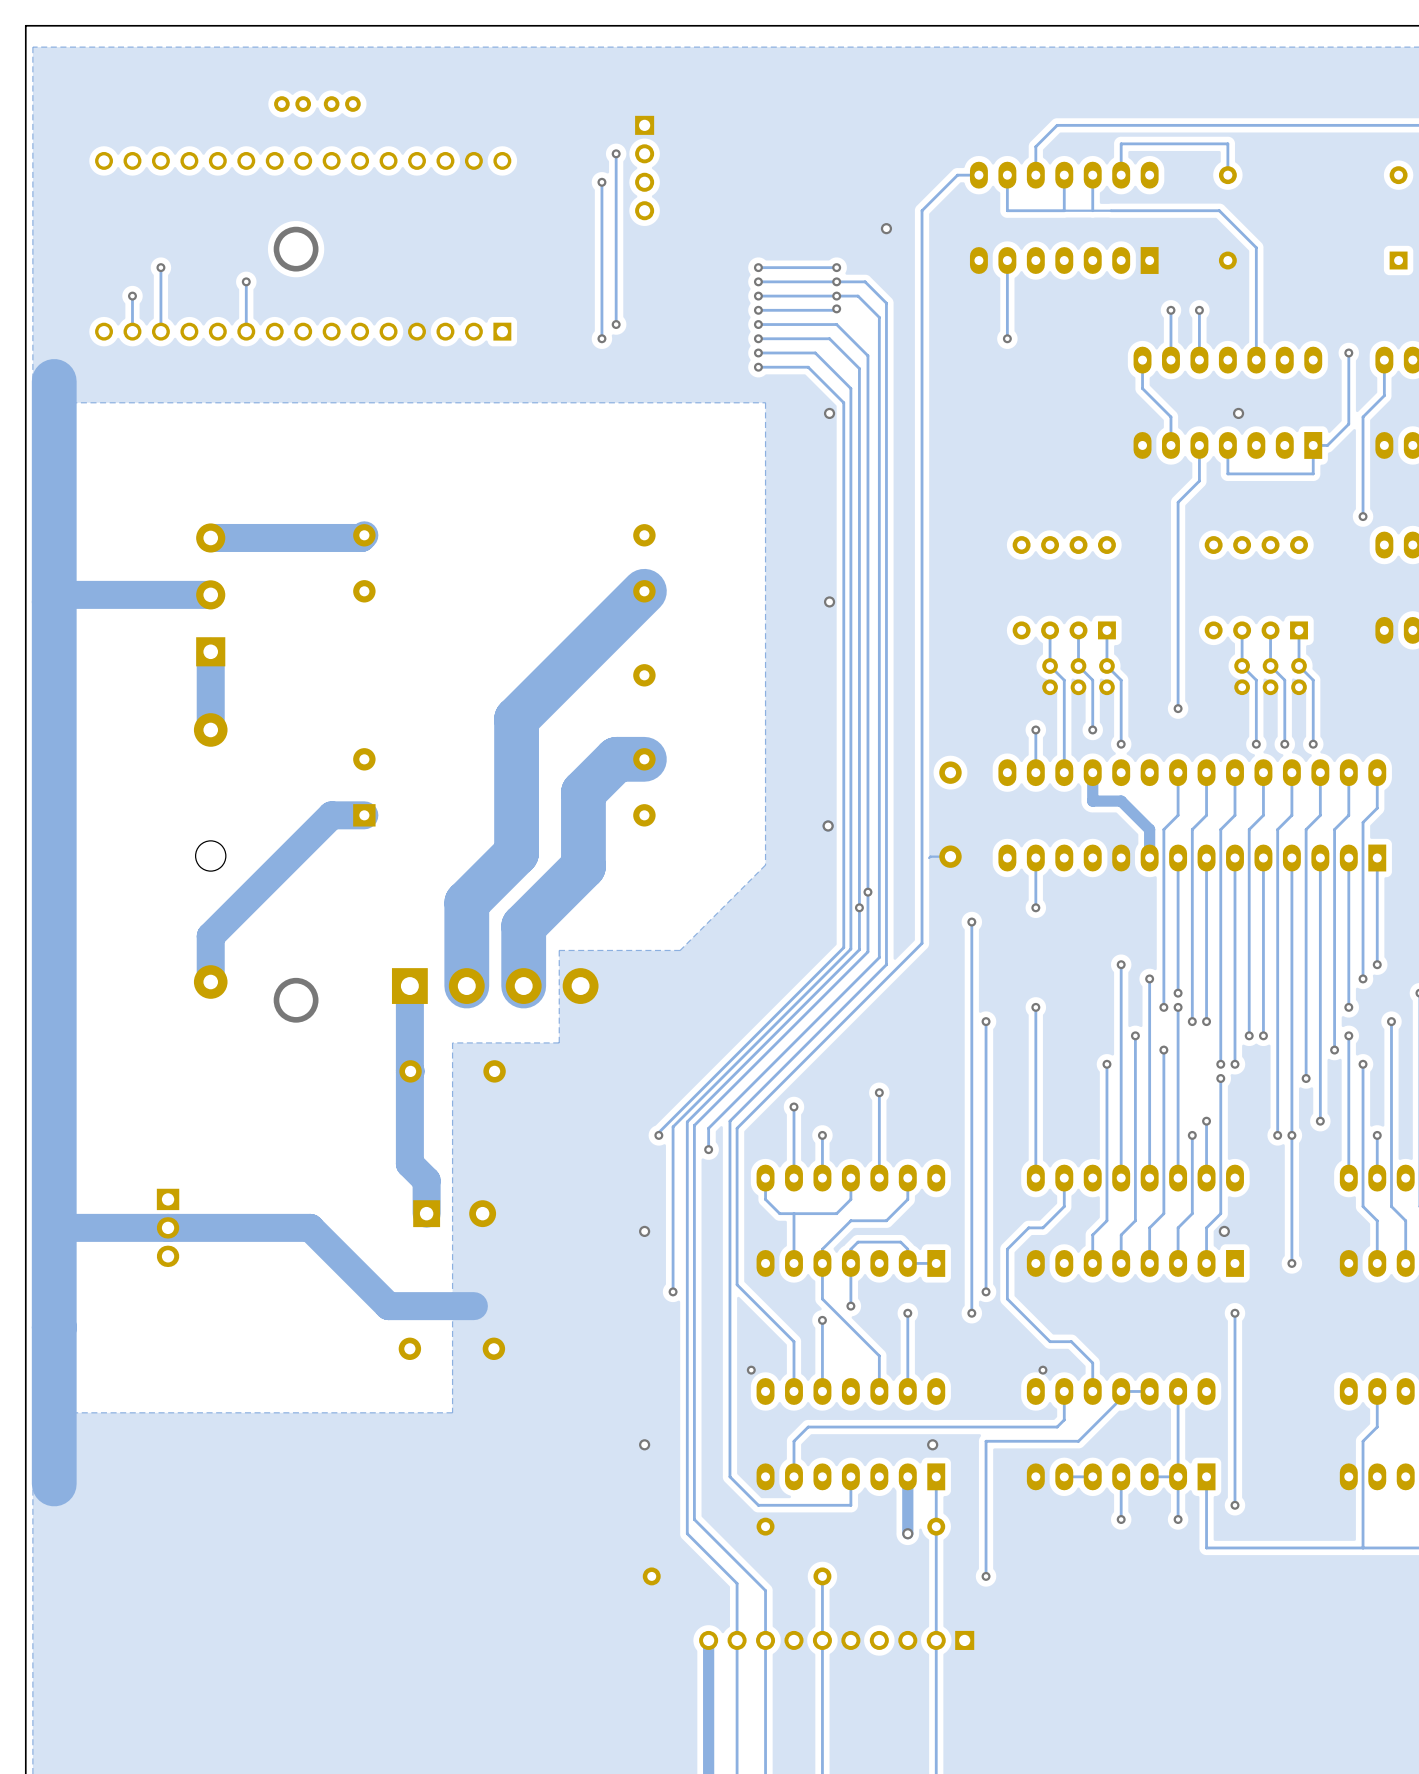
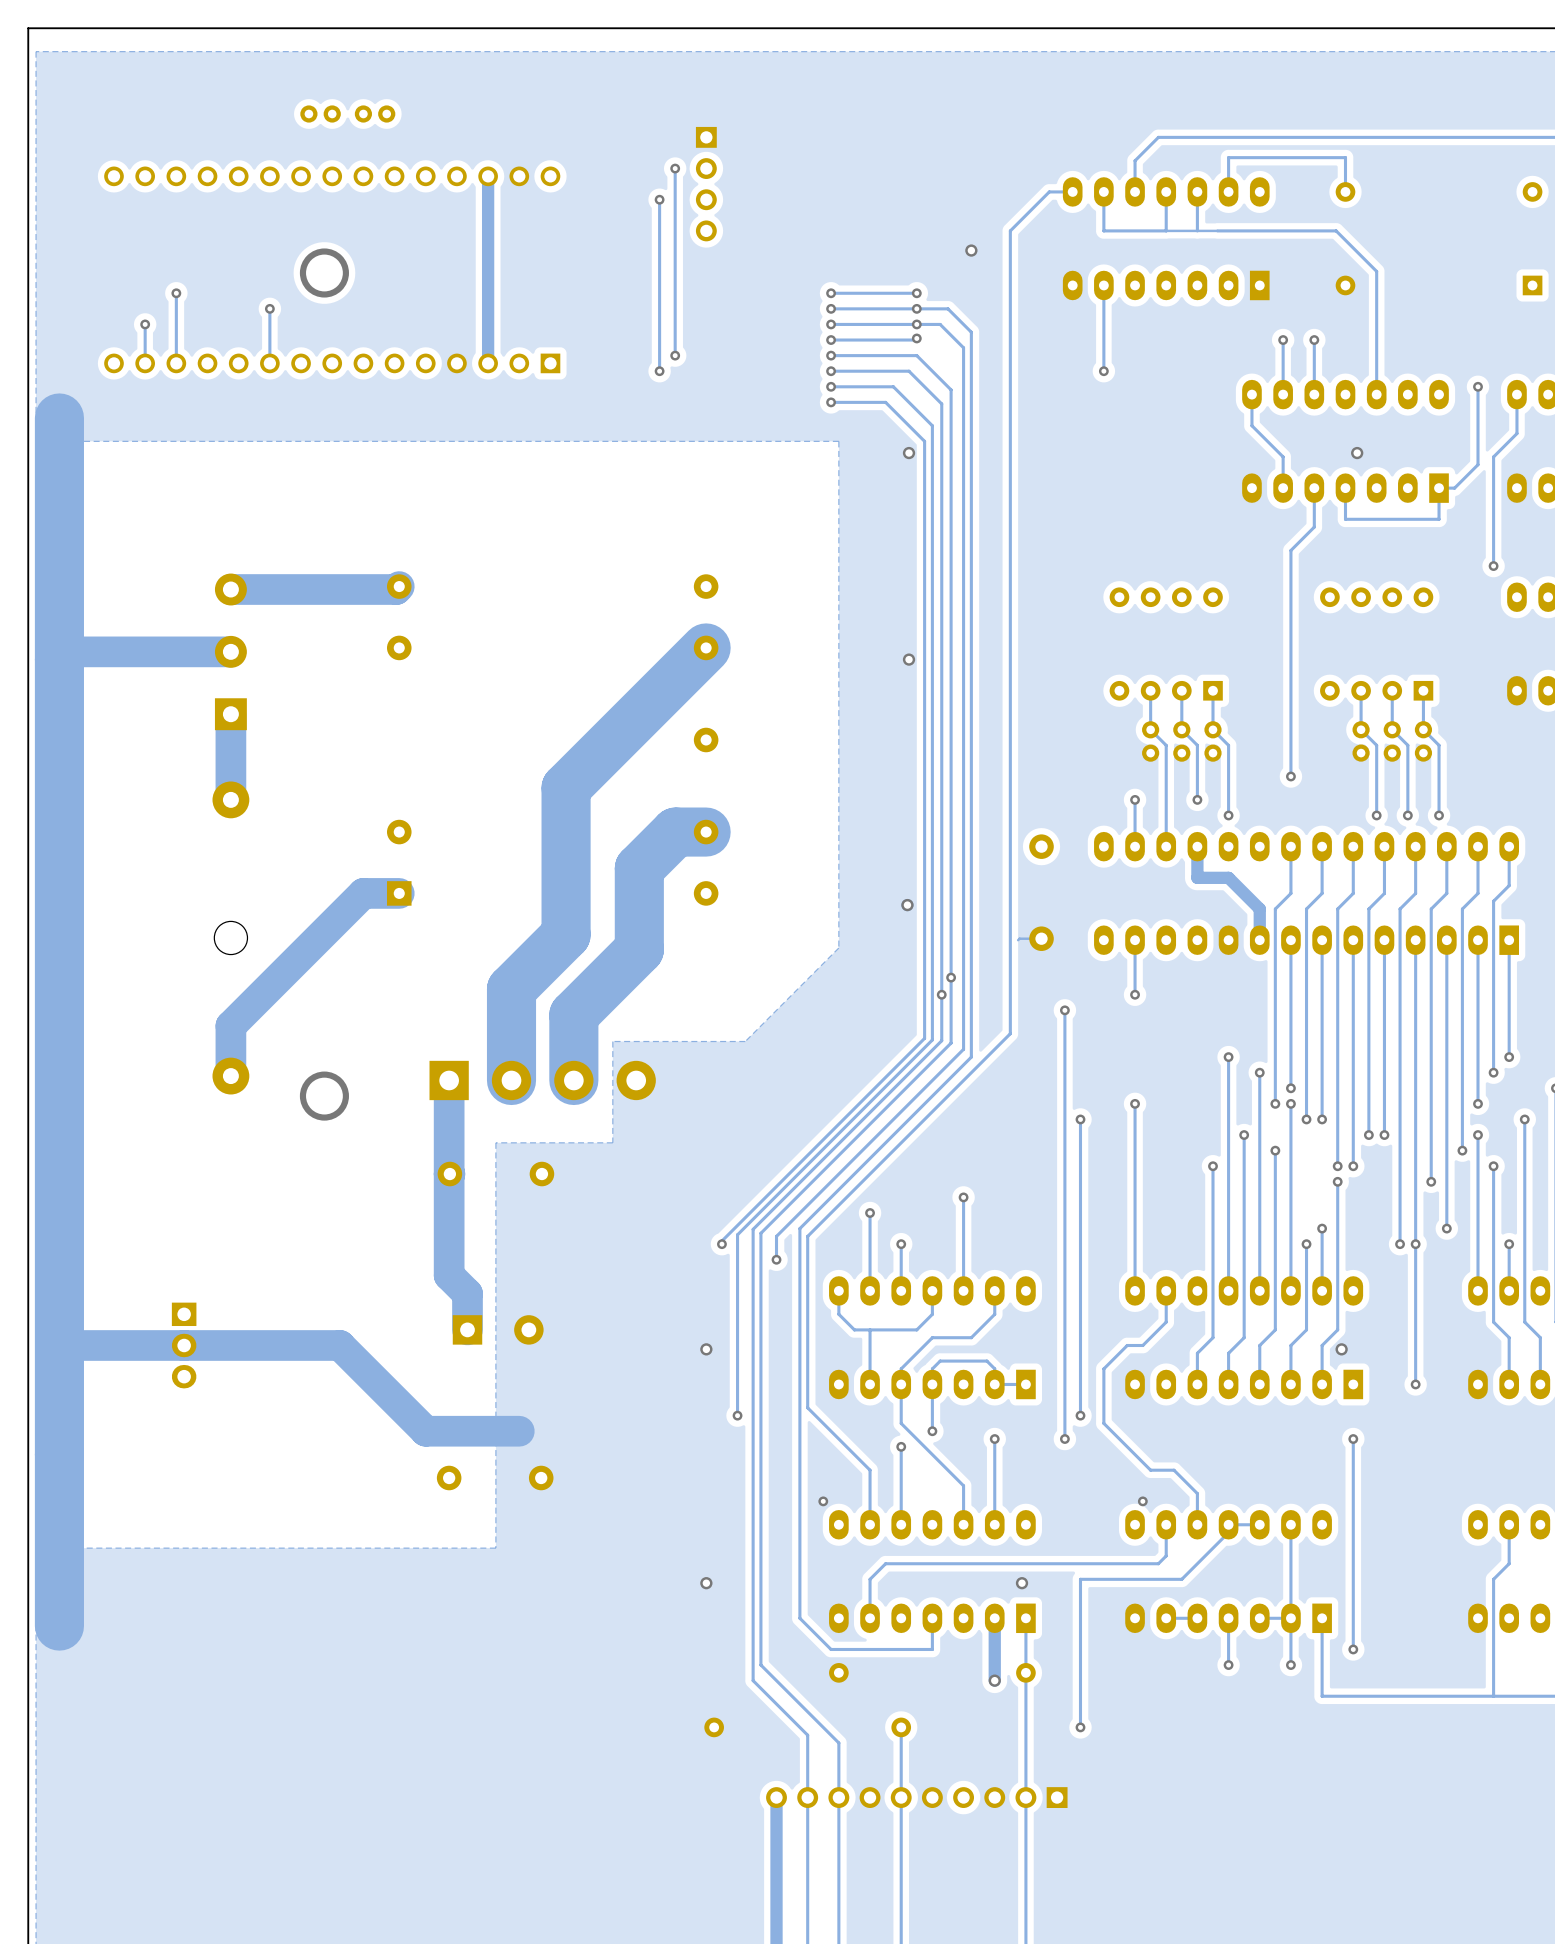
track: none -> (488, 176) (488, 363)

